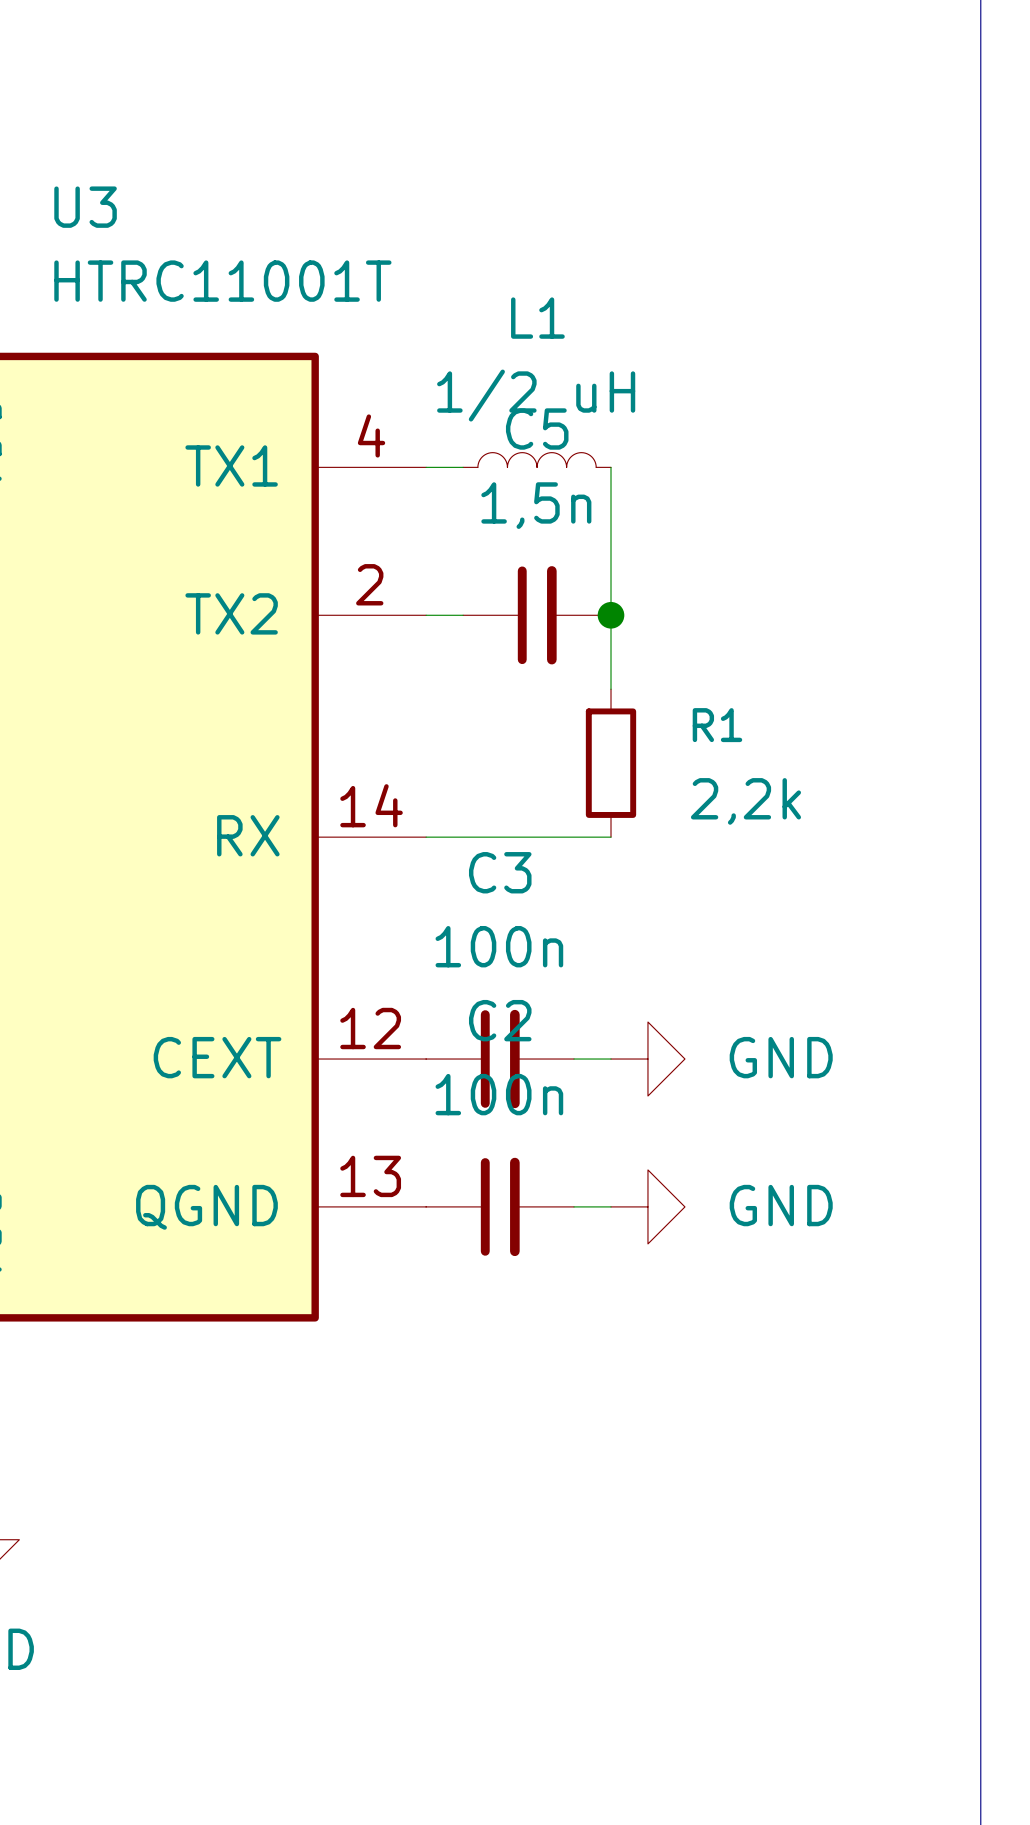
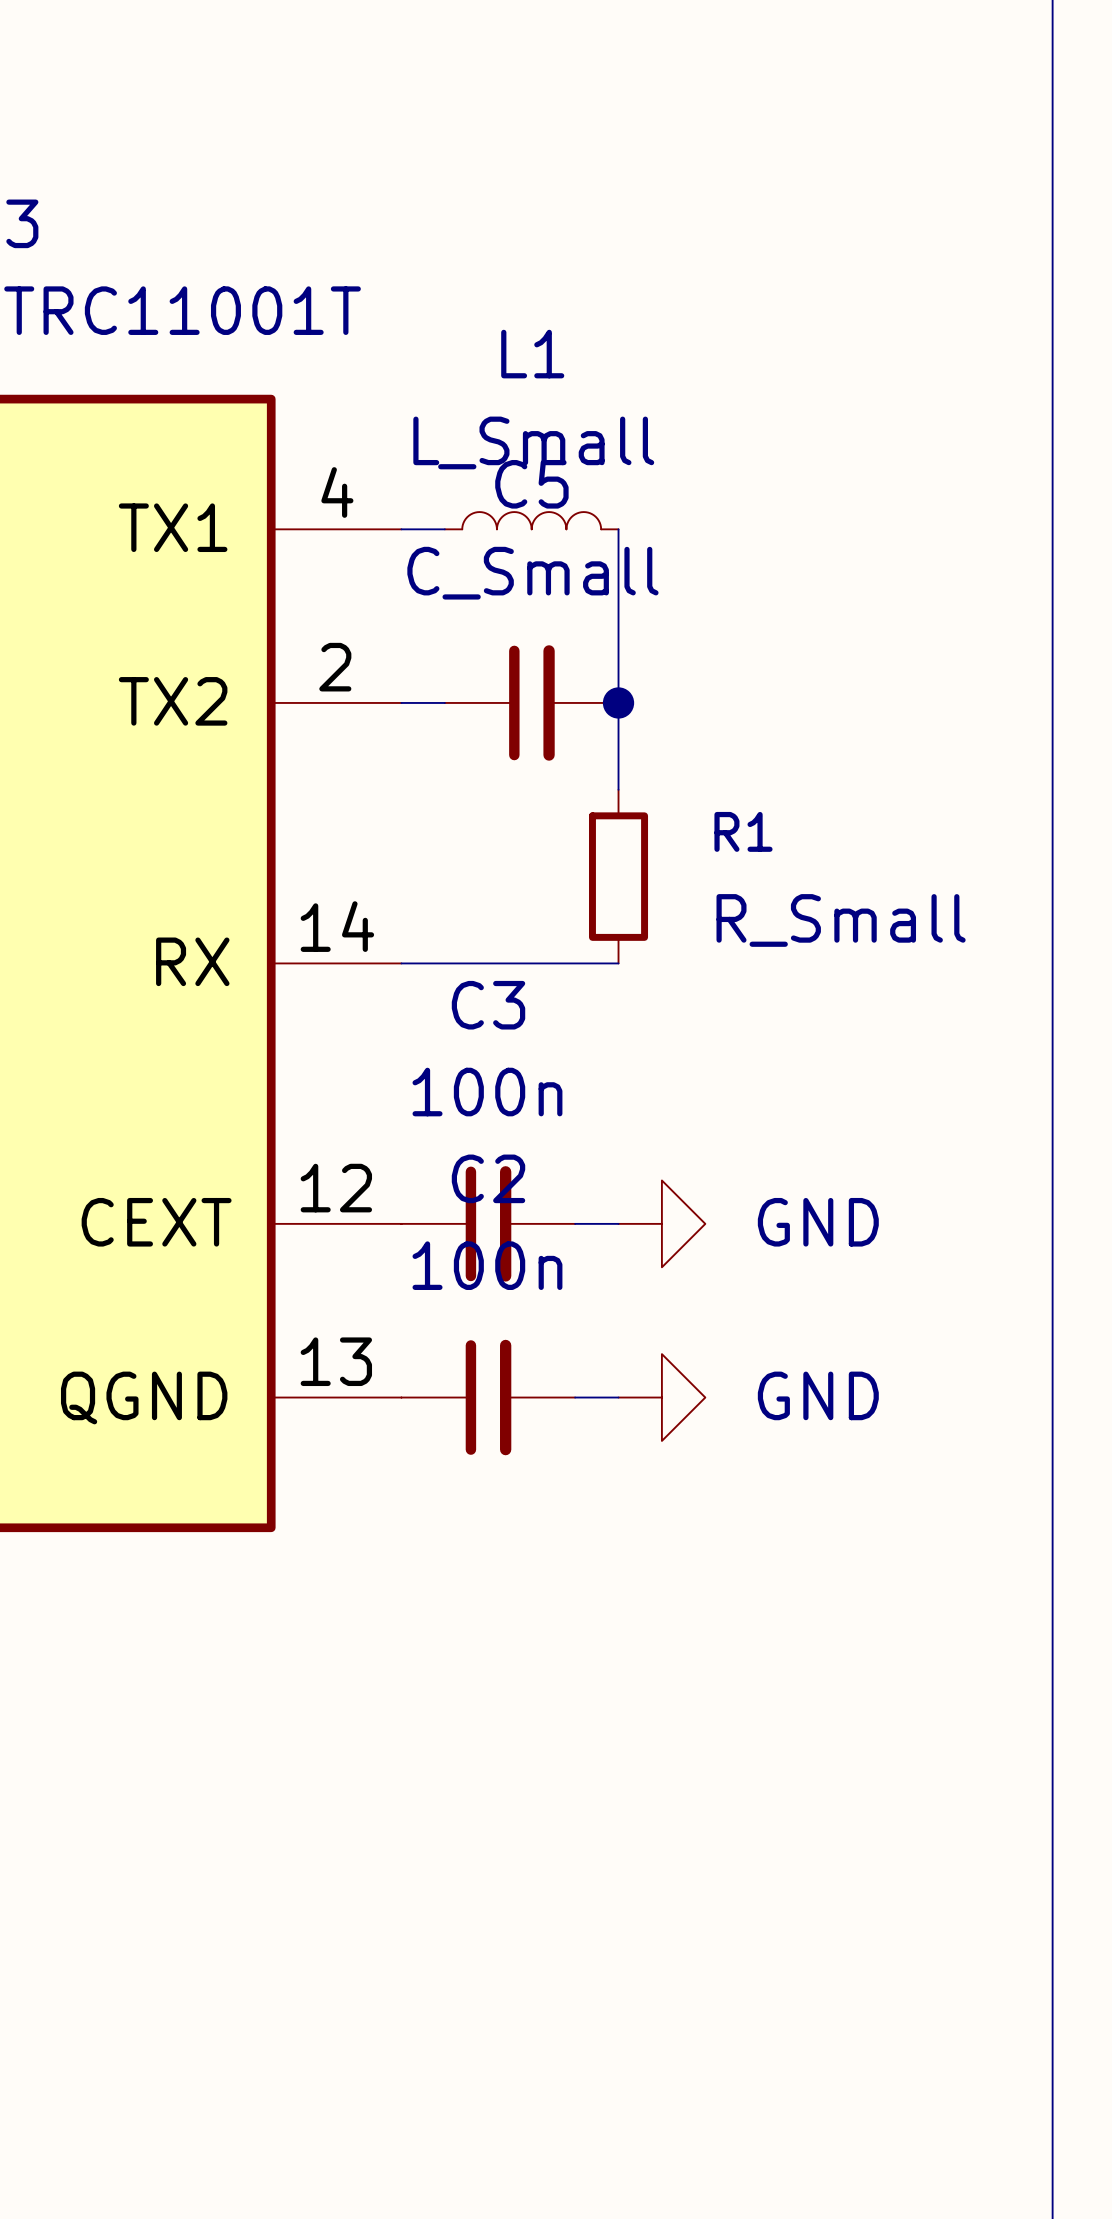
L1 value: 1/2 uH (536, 395) -> L_Small (533, 442)
C5 value: 1,5n (536, 505) -> C_Small (532, 573)
R1 value: 2,2k (745, 801) -> R_Small (841, 920)

